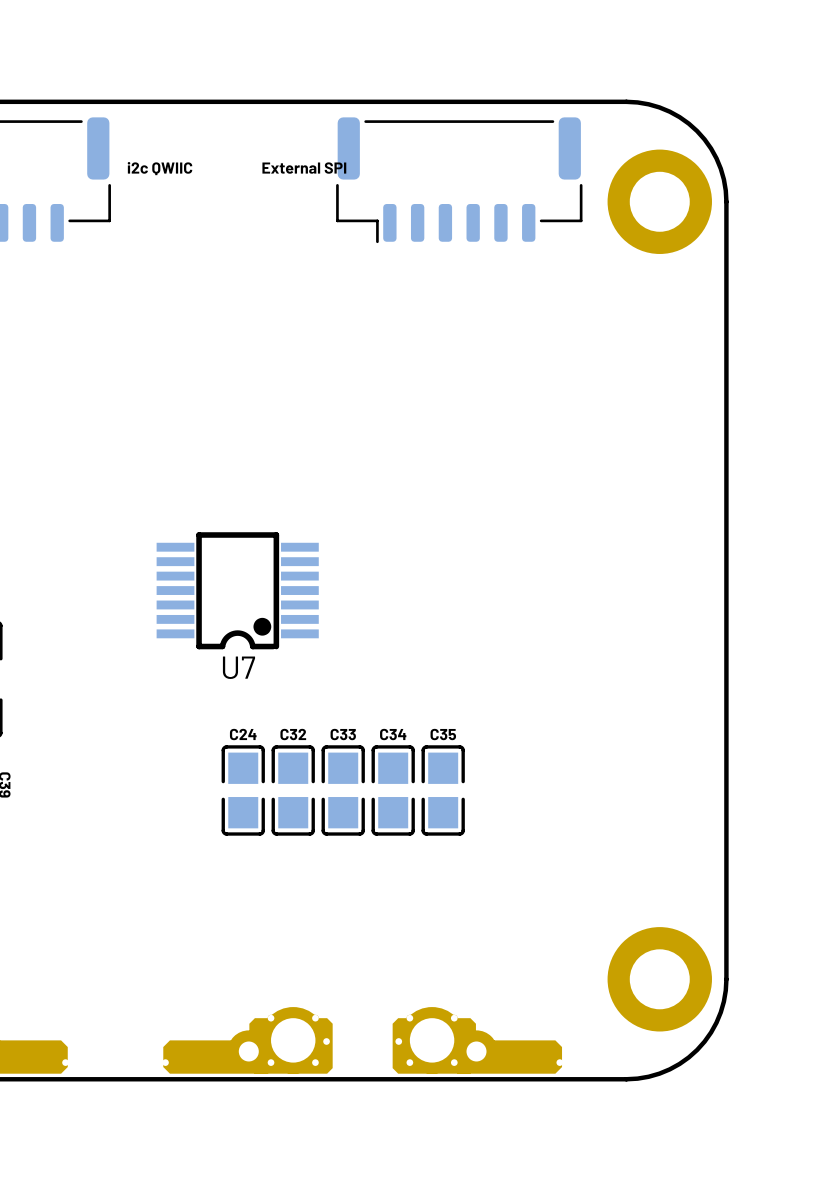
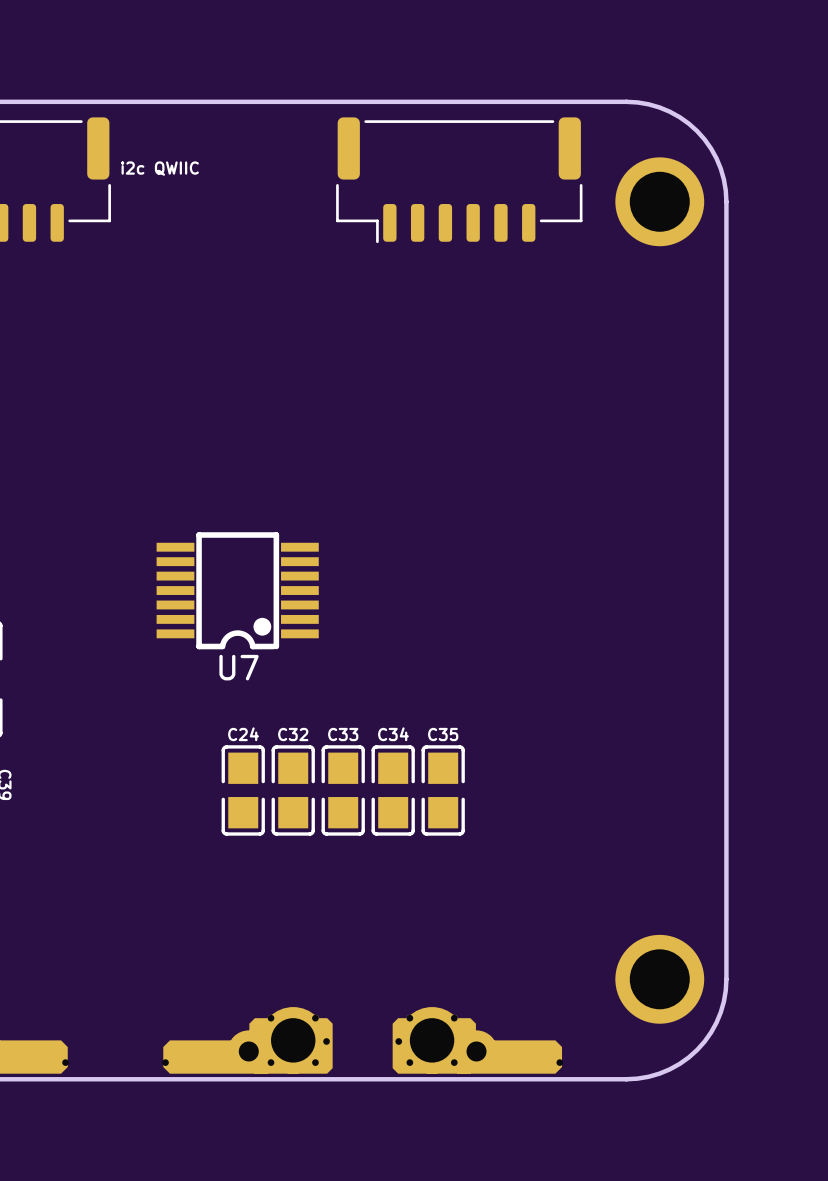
part footprint: [607, 149, 712, 254] -> [615, 157, 705, 247]
part value: External SPI (304, 168) -> none
part footprint: [607, 927, 712, 1032] -> [615, 934, 705, 1024]

